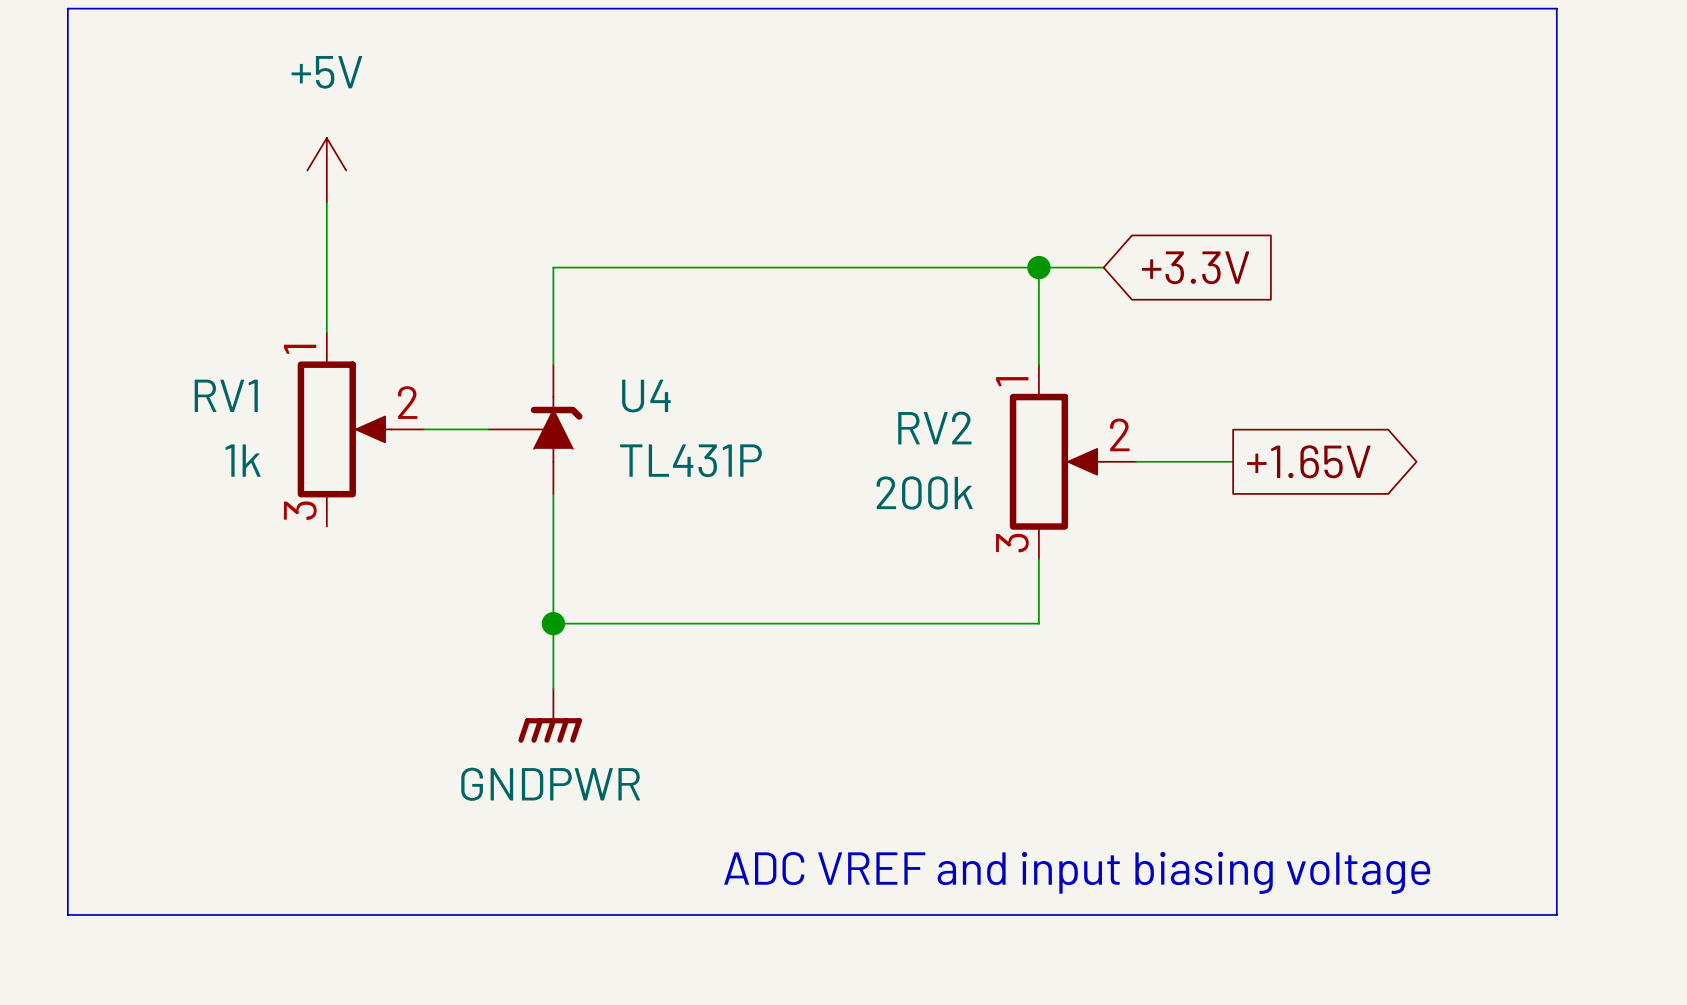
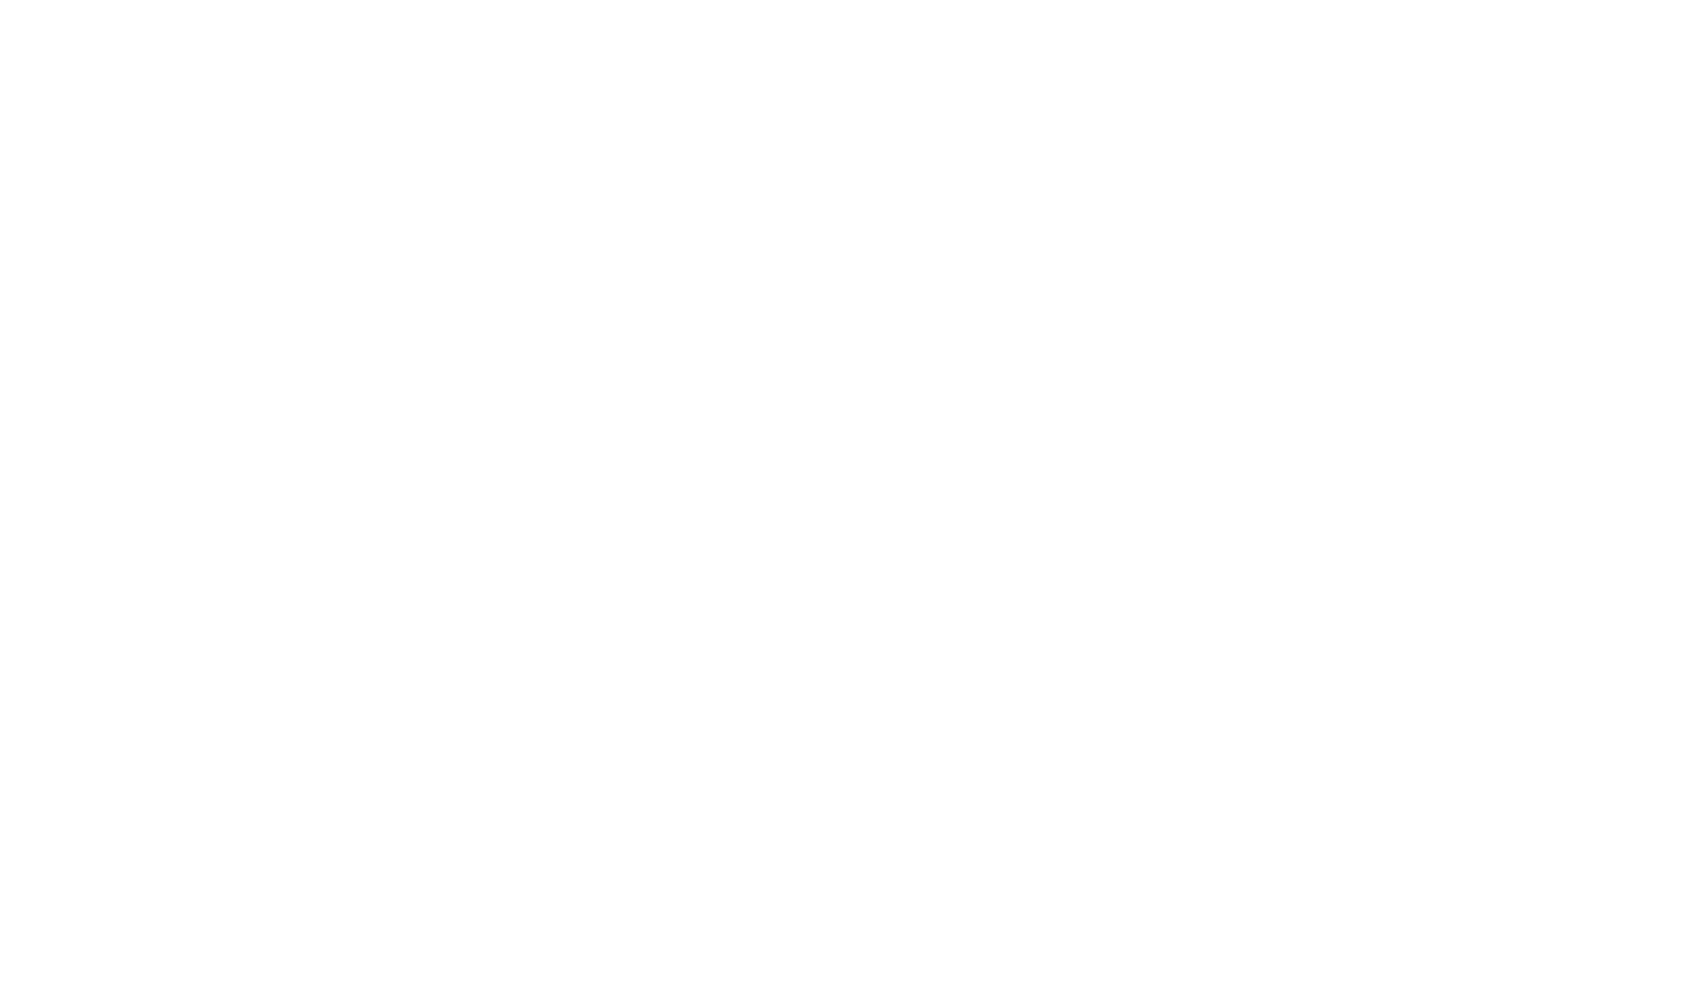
line: (67, 8) (1556, 8) (1556, 914) (67, 914) (67, 8) -> none
power symbol: +5V (326, 170) -> none
wire: (326, 202) (326, 332) -> none
wire: (1038, 267) (1038, 364) -> none
junction: (1038, 267) -> none
wire: (1103, 267) (553, 267) (553, 364) -> none
global label: +3.3V (1195, 267) -> none
RV1: 1k (360, 429) -> none
wire: (423, 429) (488, 429) -> none
U4: TL431P (535, 429) -> none
RV2: 200k (1072, 461) -> none
wire: (1136, 461) (1233, 461) -> none
global label: +1.65V (1308, 461) -> none
wire: (553, 494) (553, 688) -> none
wire: (1038, 558) (1038, 623) (553, 623) -> none
junction: (553, 623) -> none
power symbol: GNDPWR (550, 715) -> none
text: ADC VREF and input biasing voltage (1077, 872) -> none

